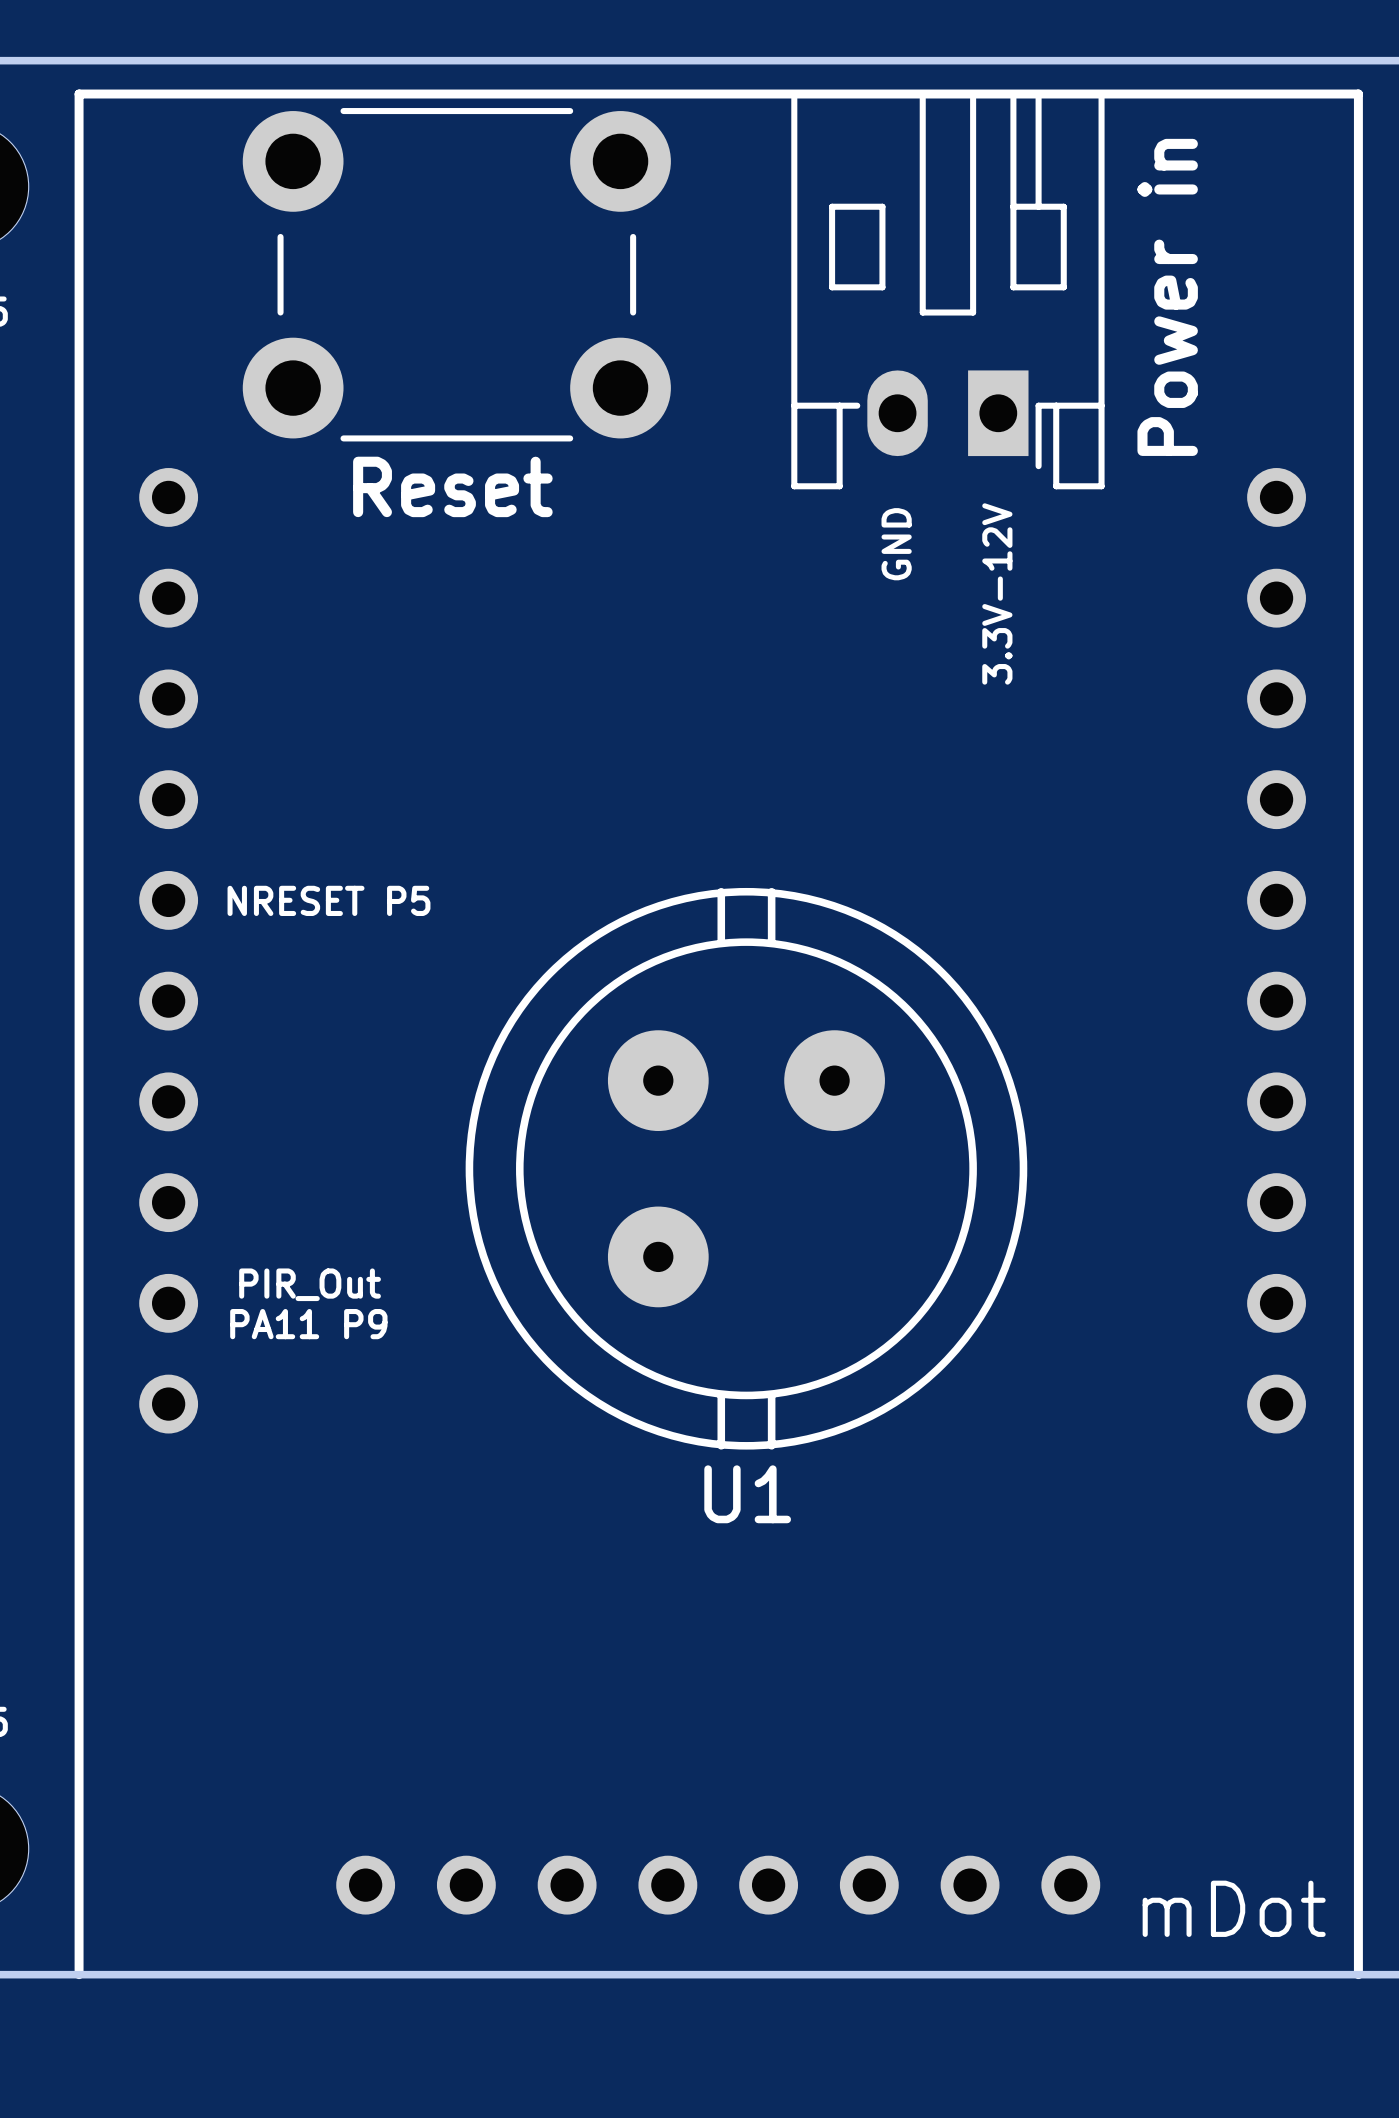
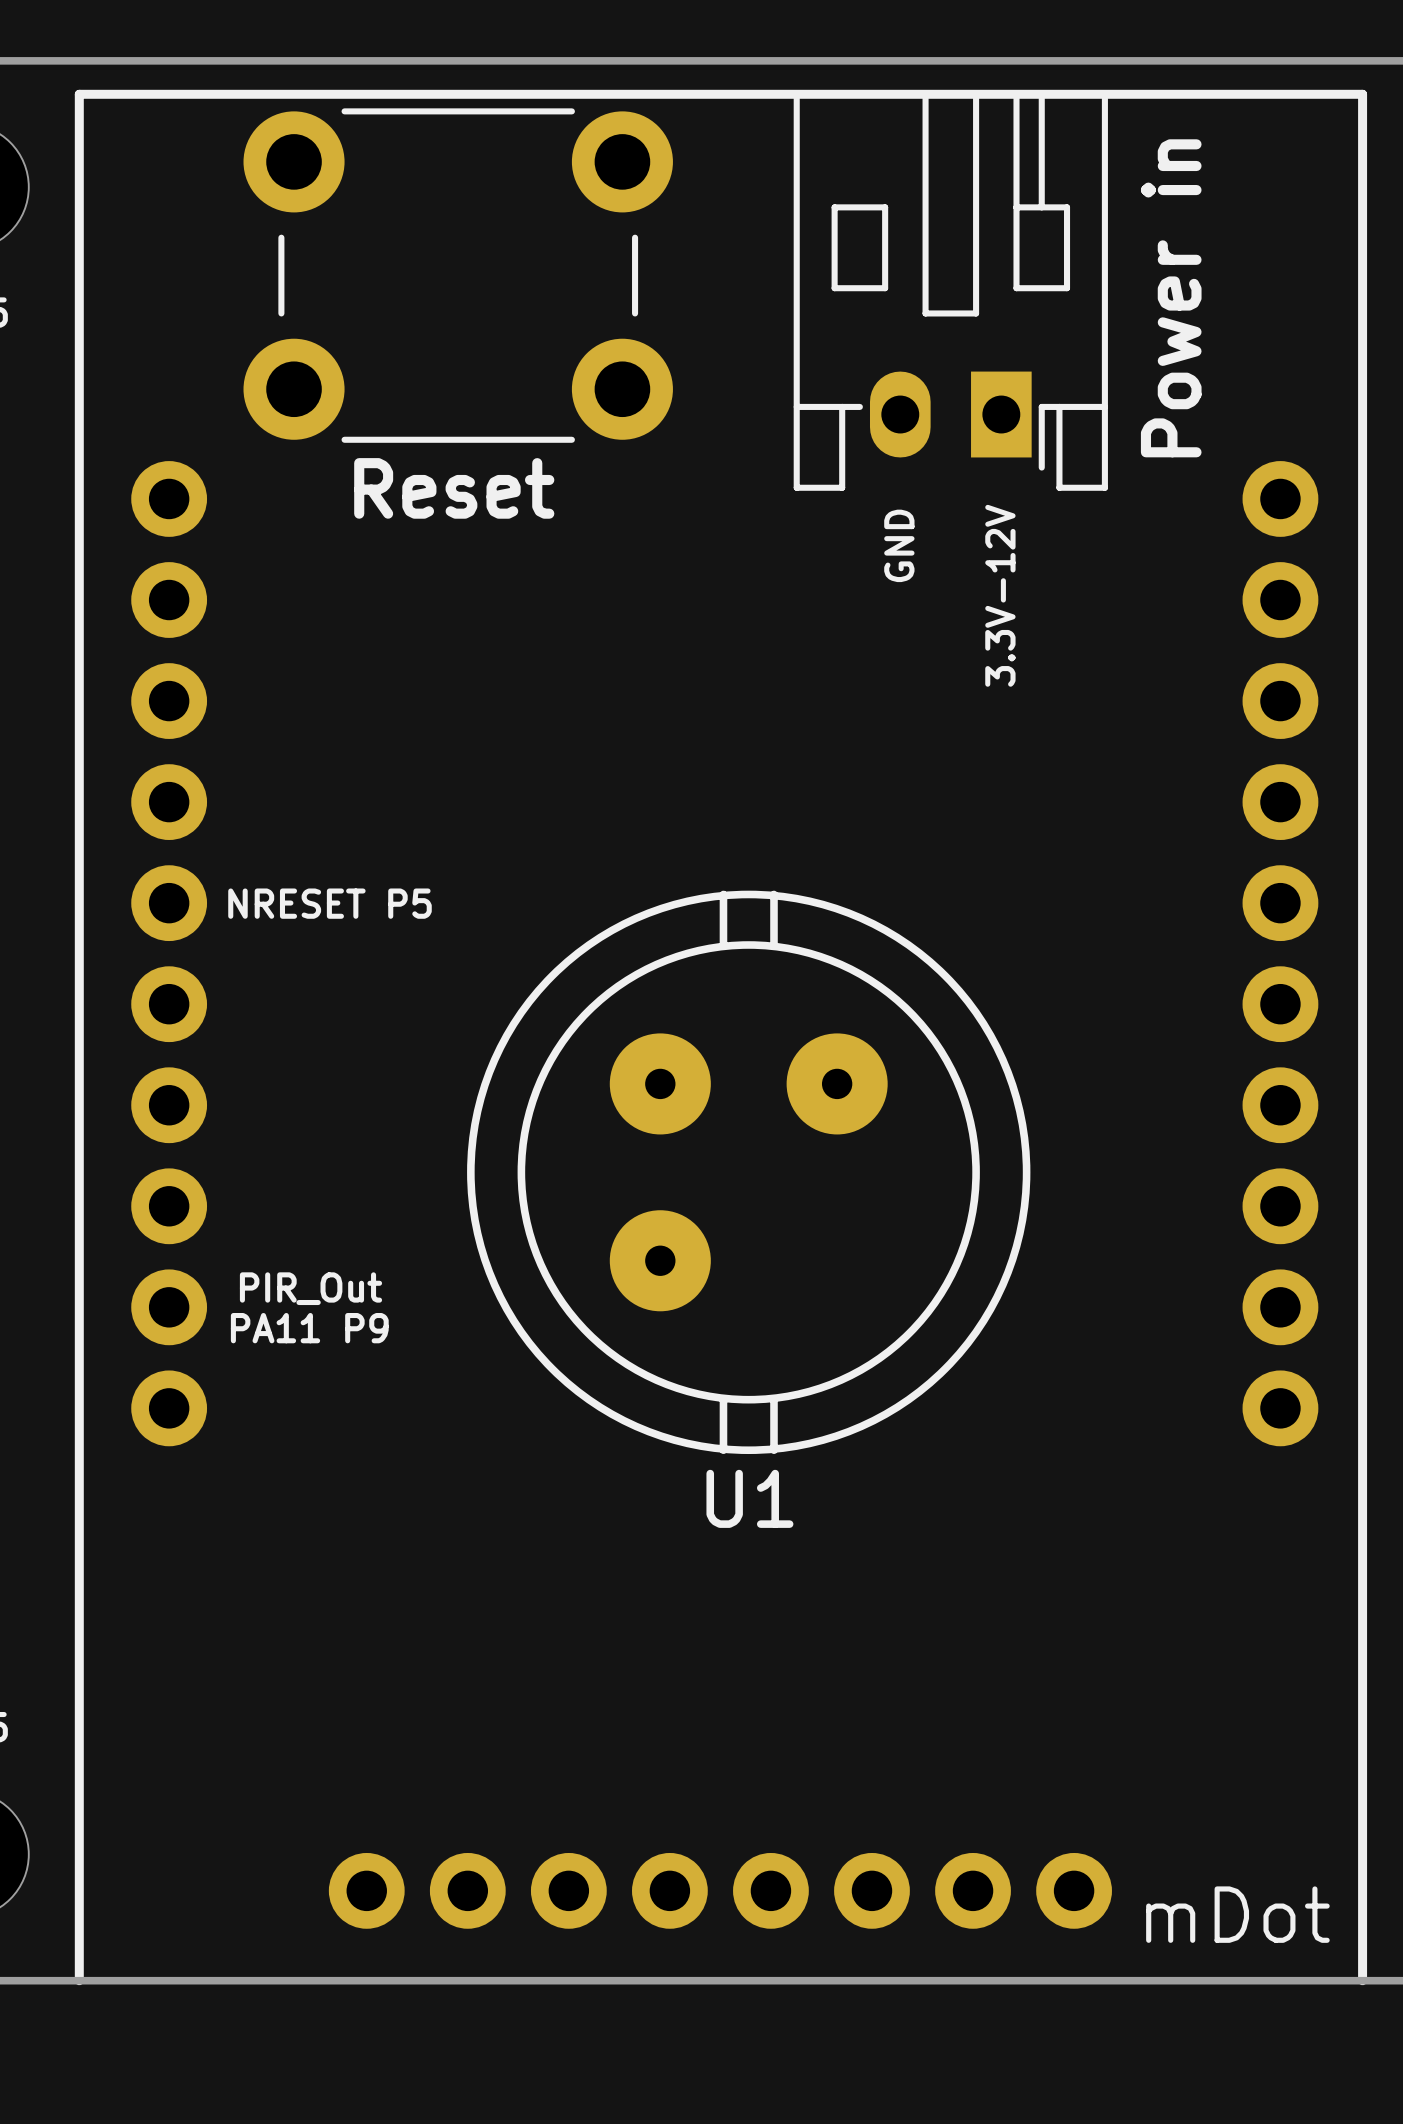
part footprint: [74, 89, 1363, 1980] -> [74, 89, 1368, 1986]

